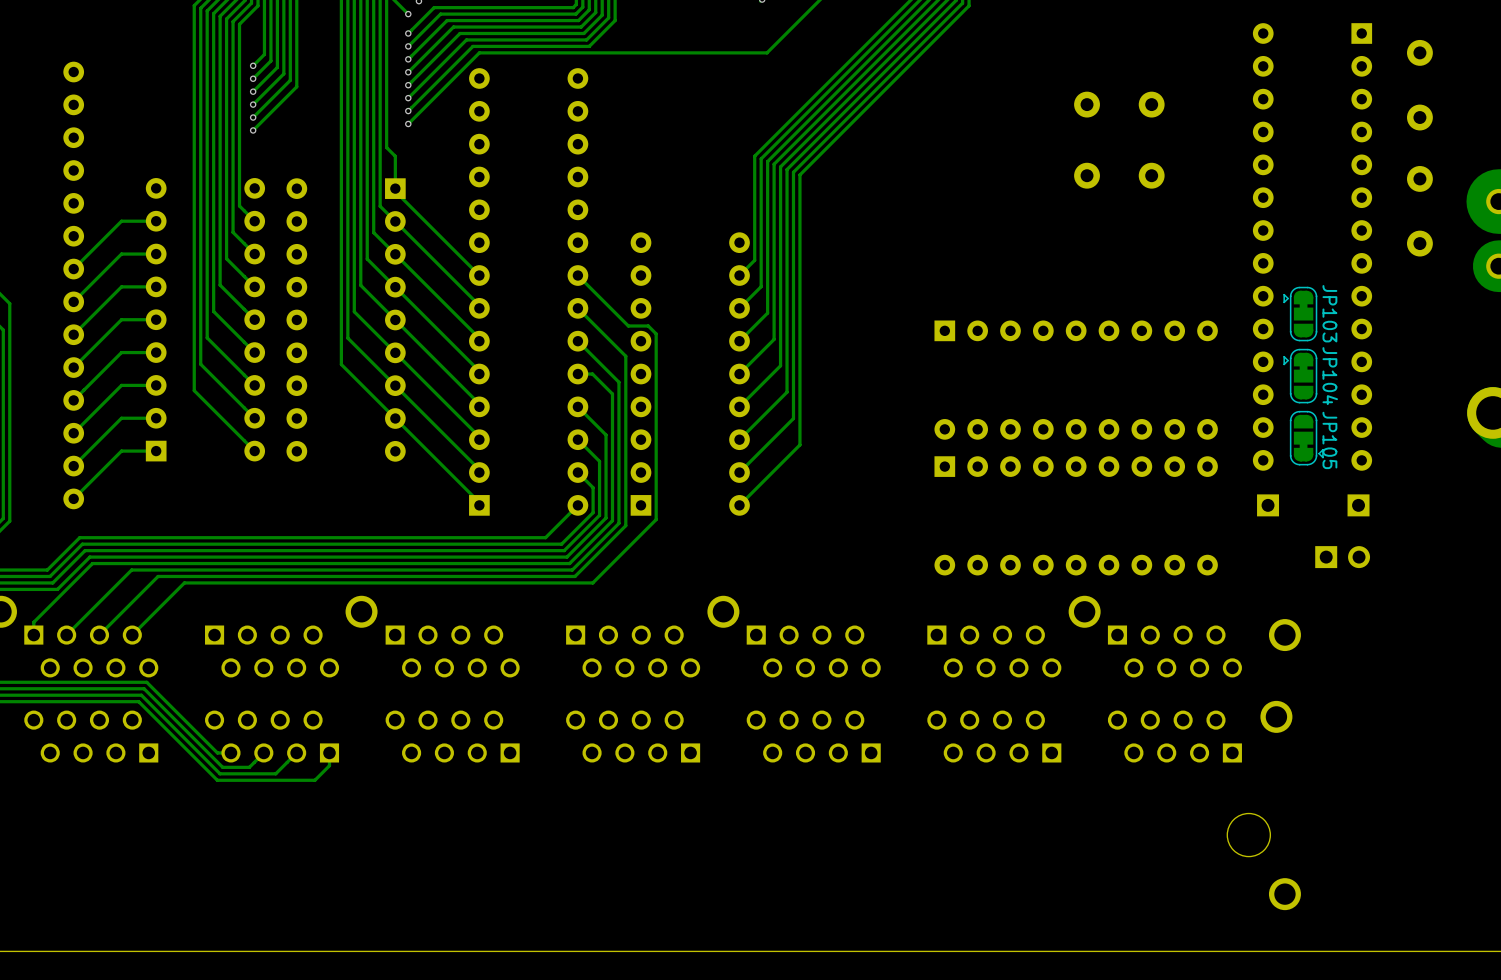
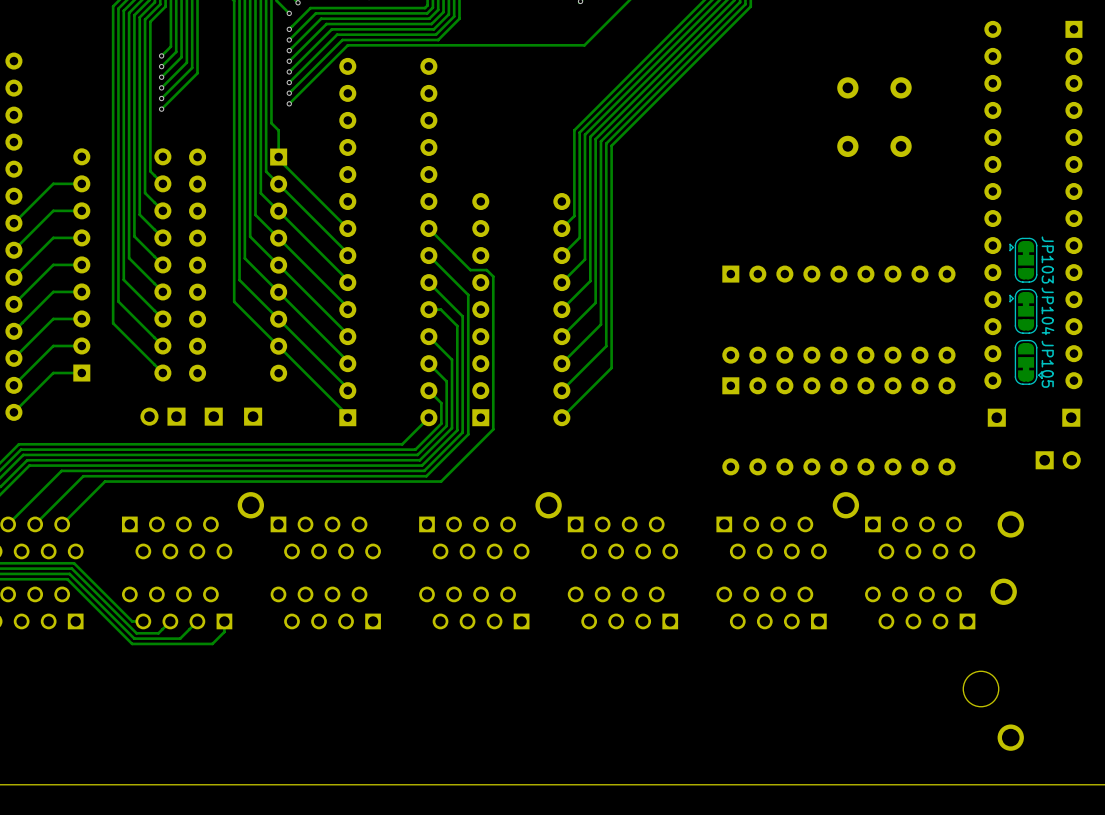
part: none -> (162, 416)
part: none -> (213, 416)
part: none -> (253, 416)

